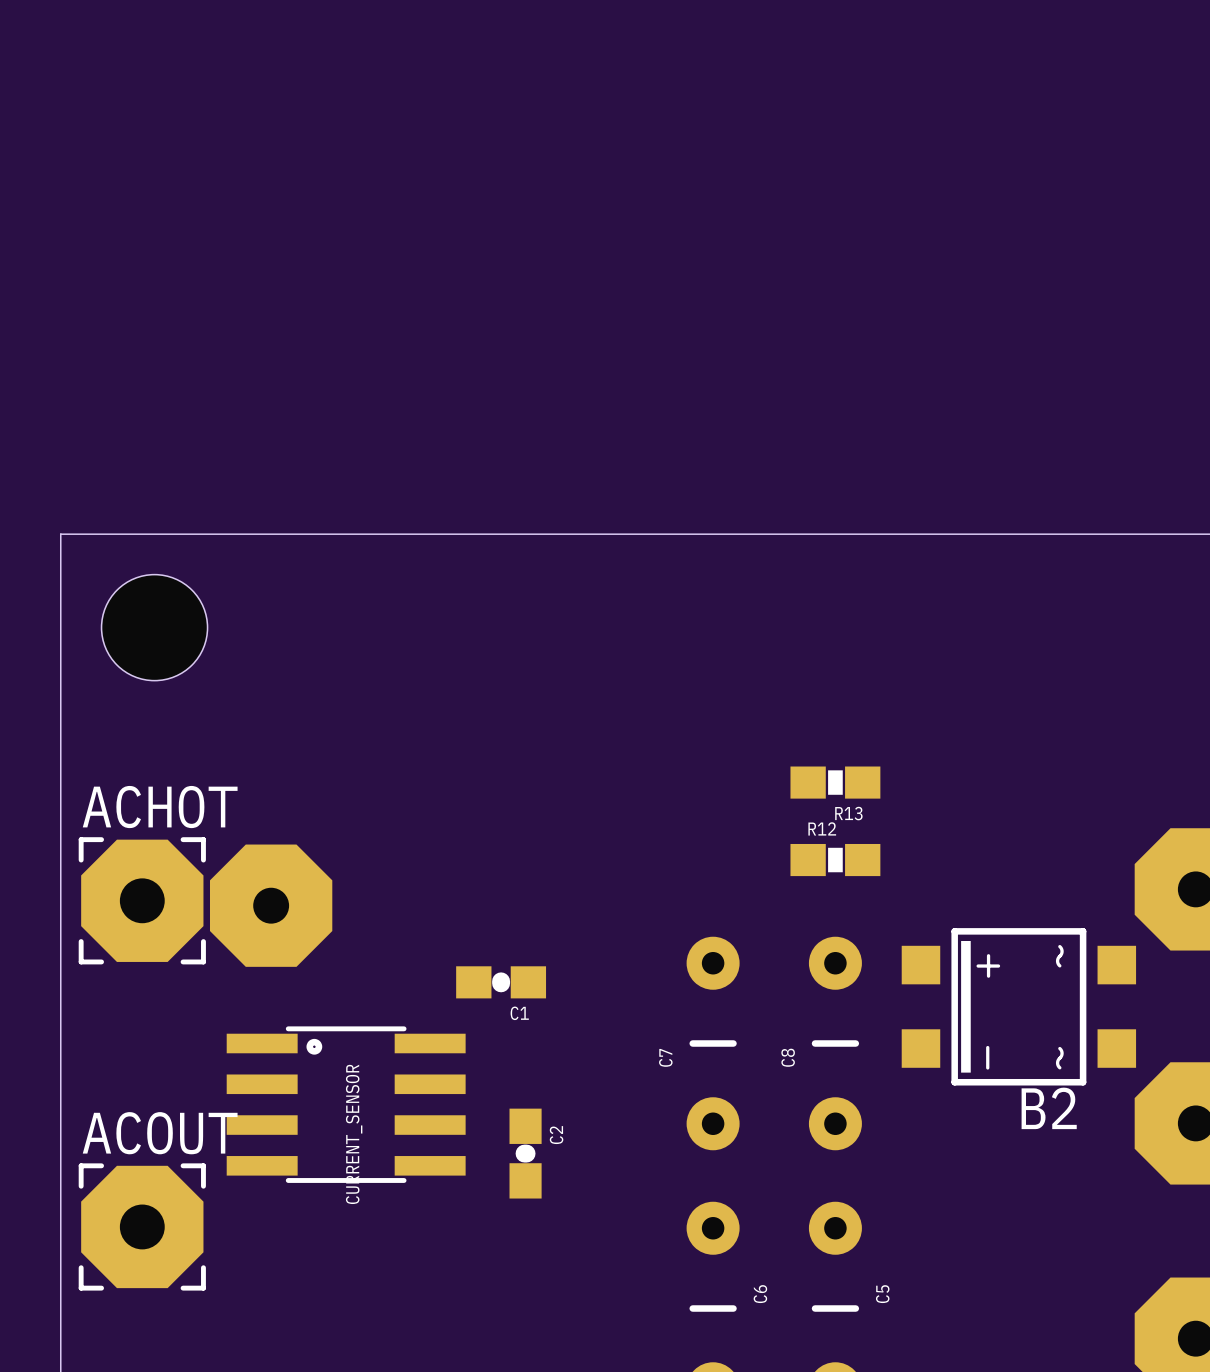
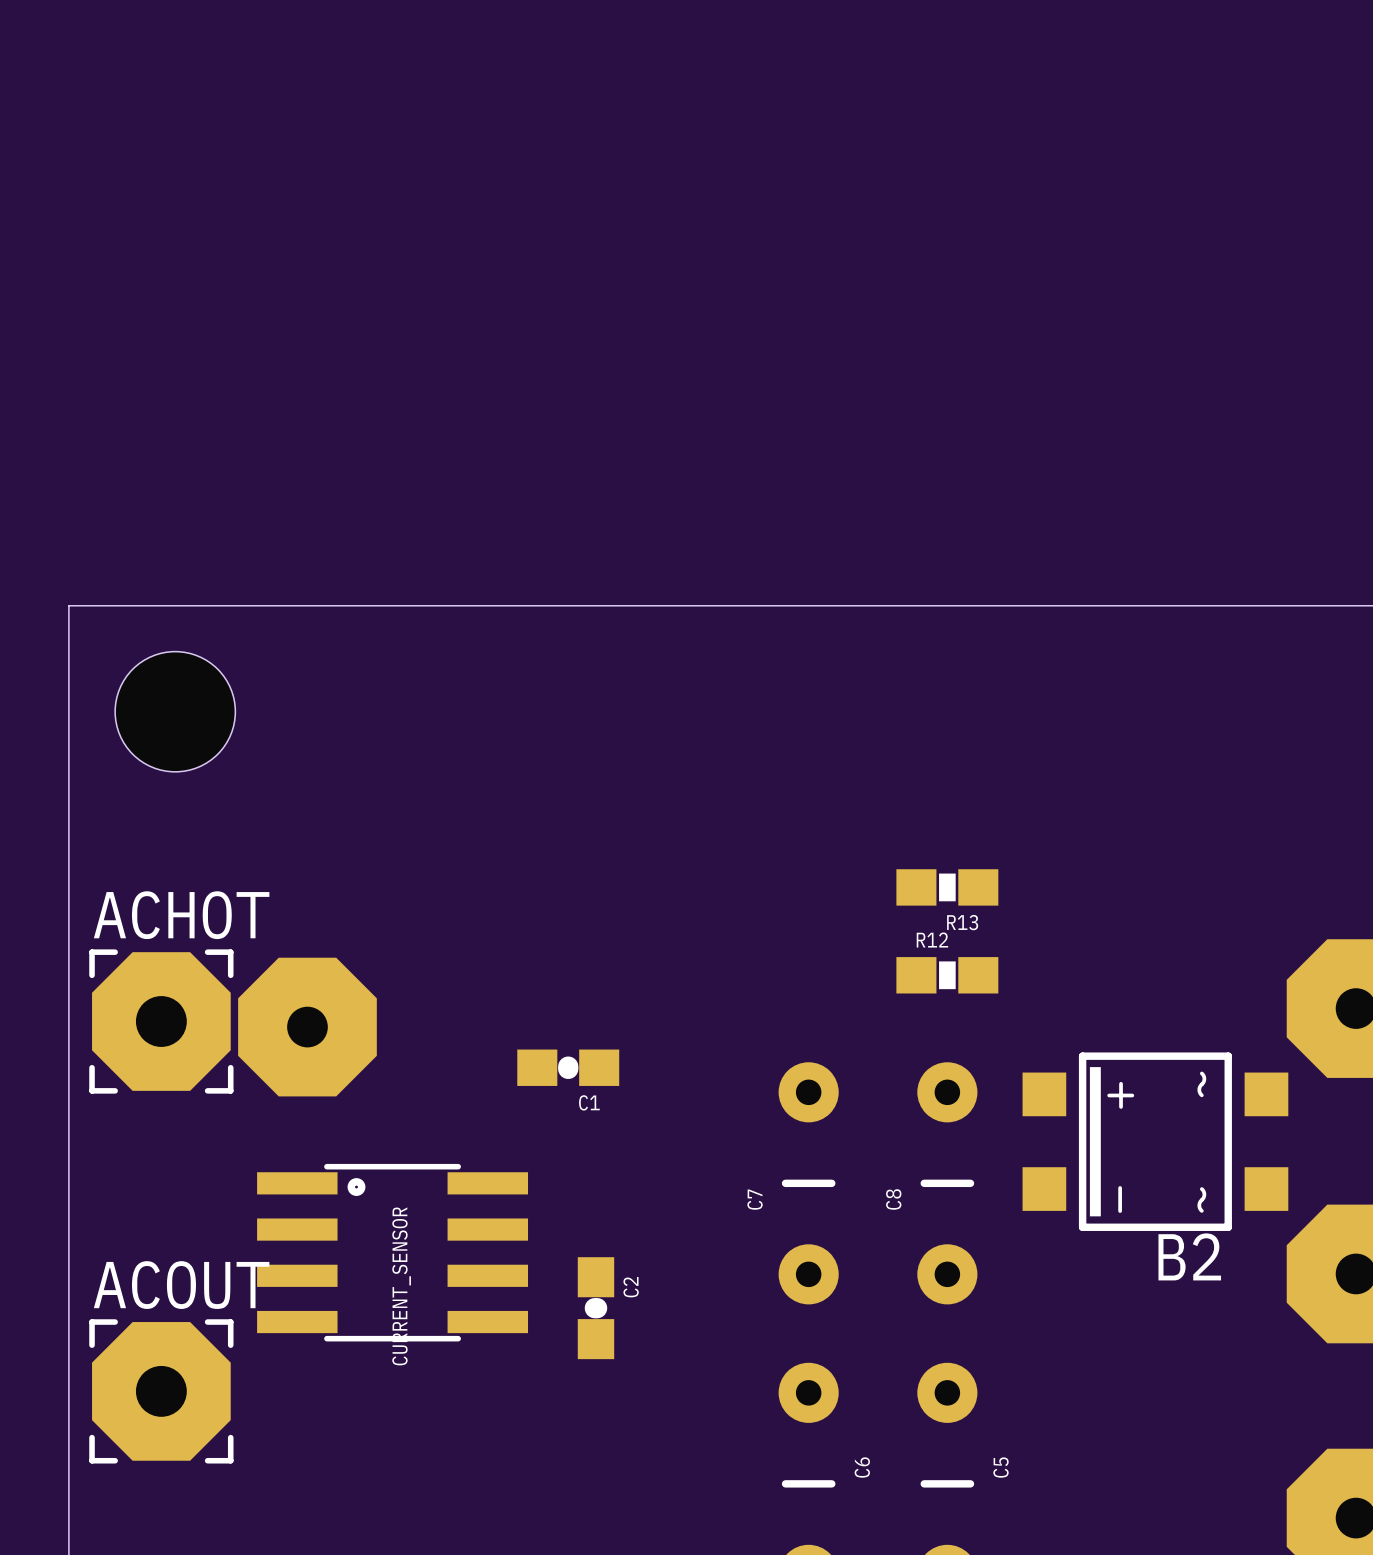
C1 position: (501, 982) -> (568, 1067)

